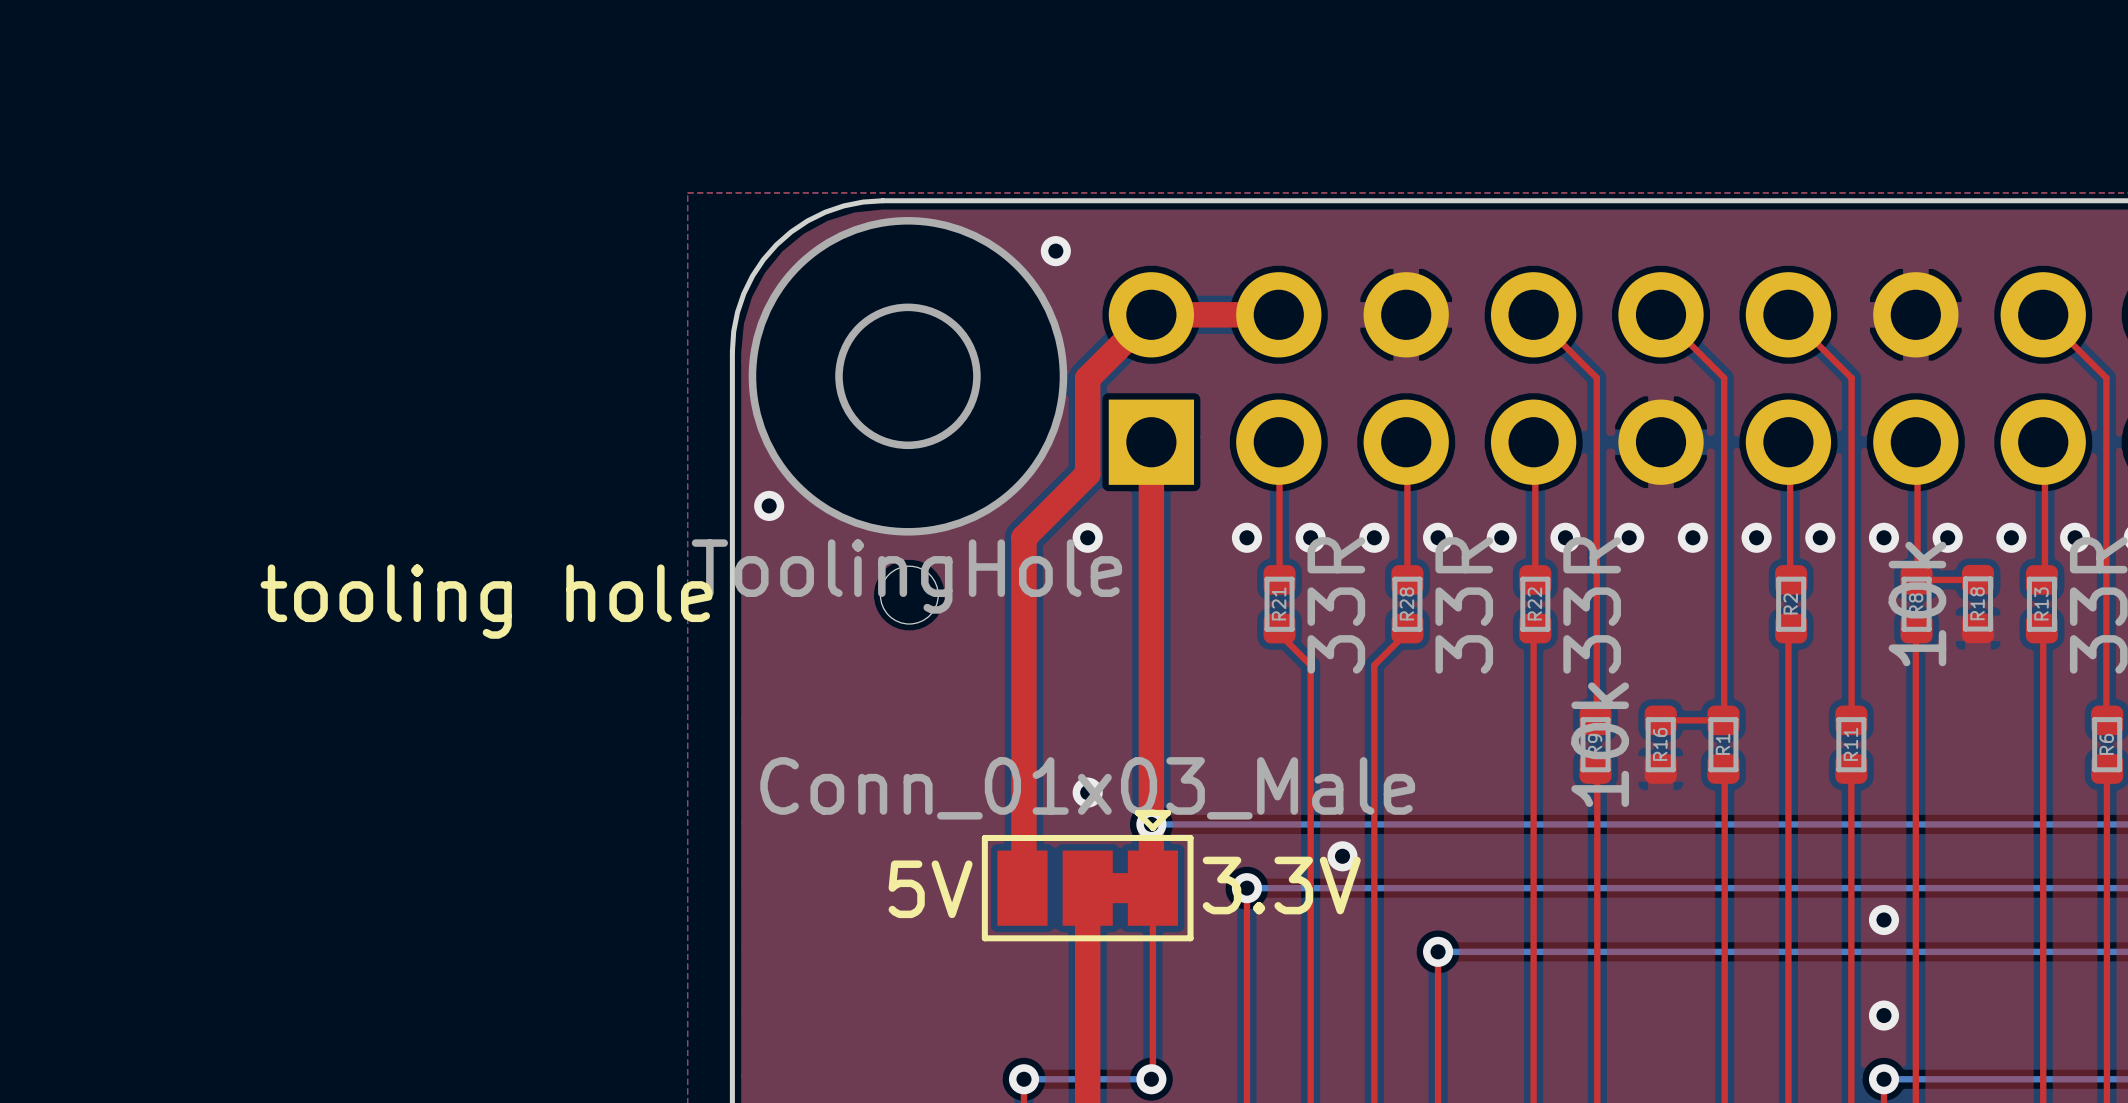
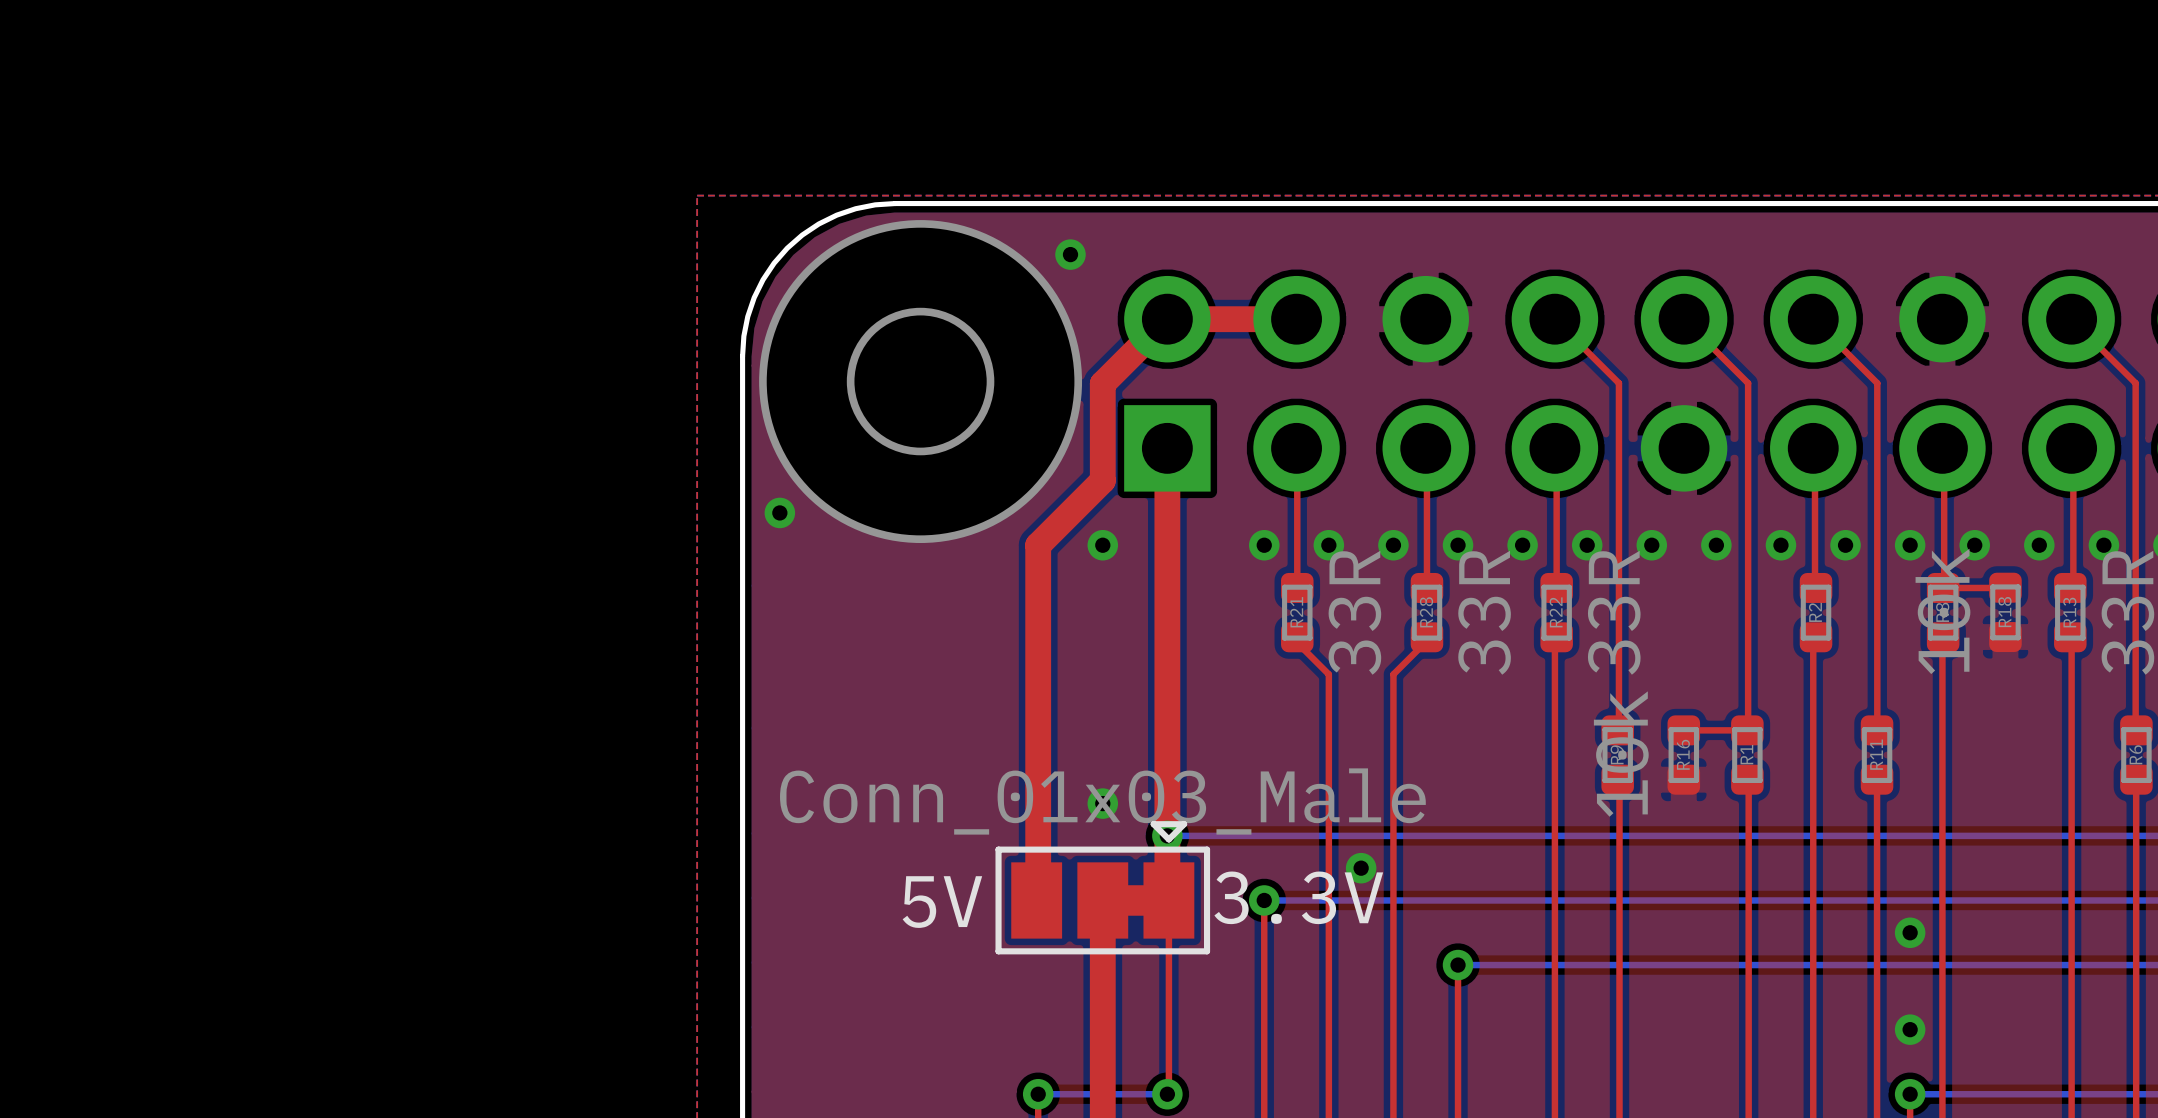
part: ToolingHole (909, 595) -> none

